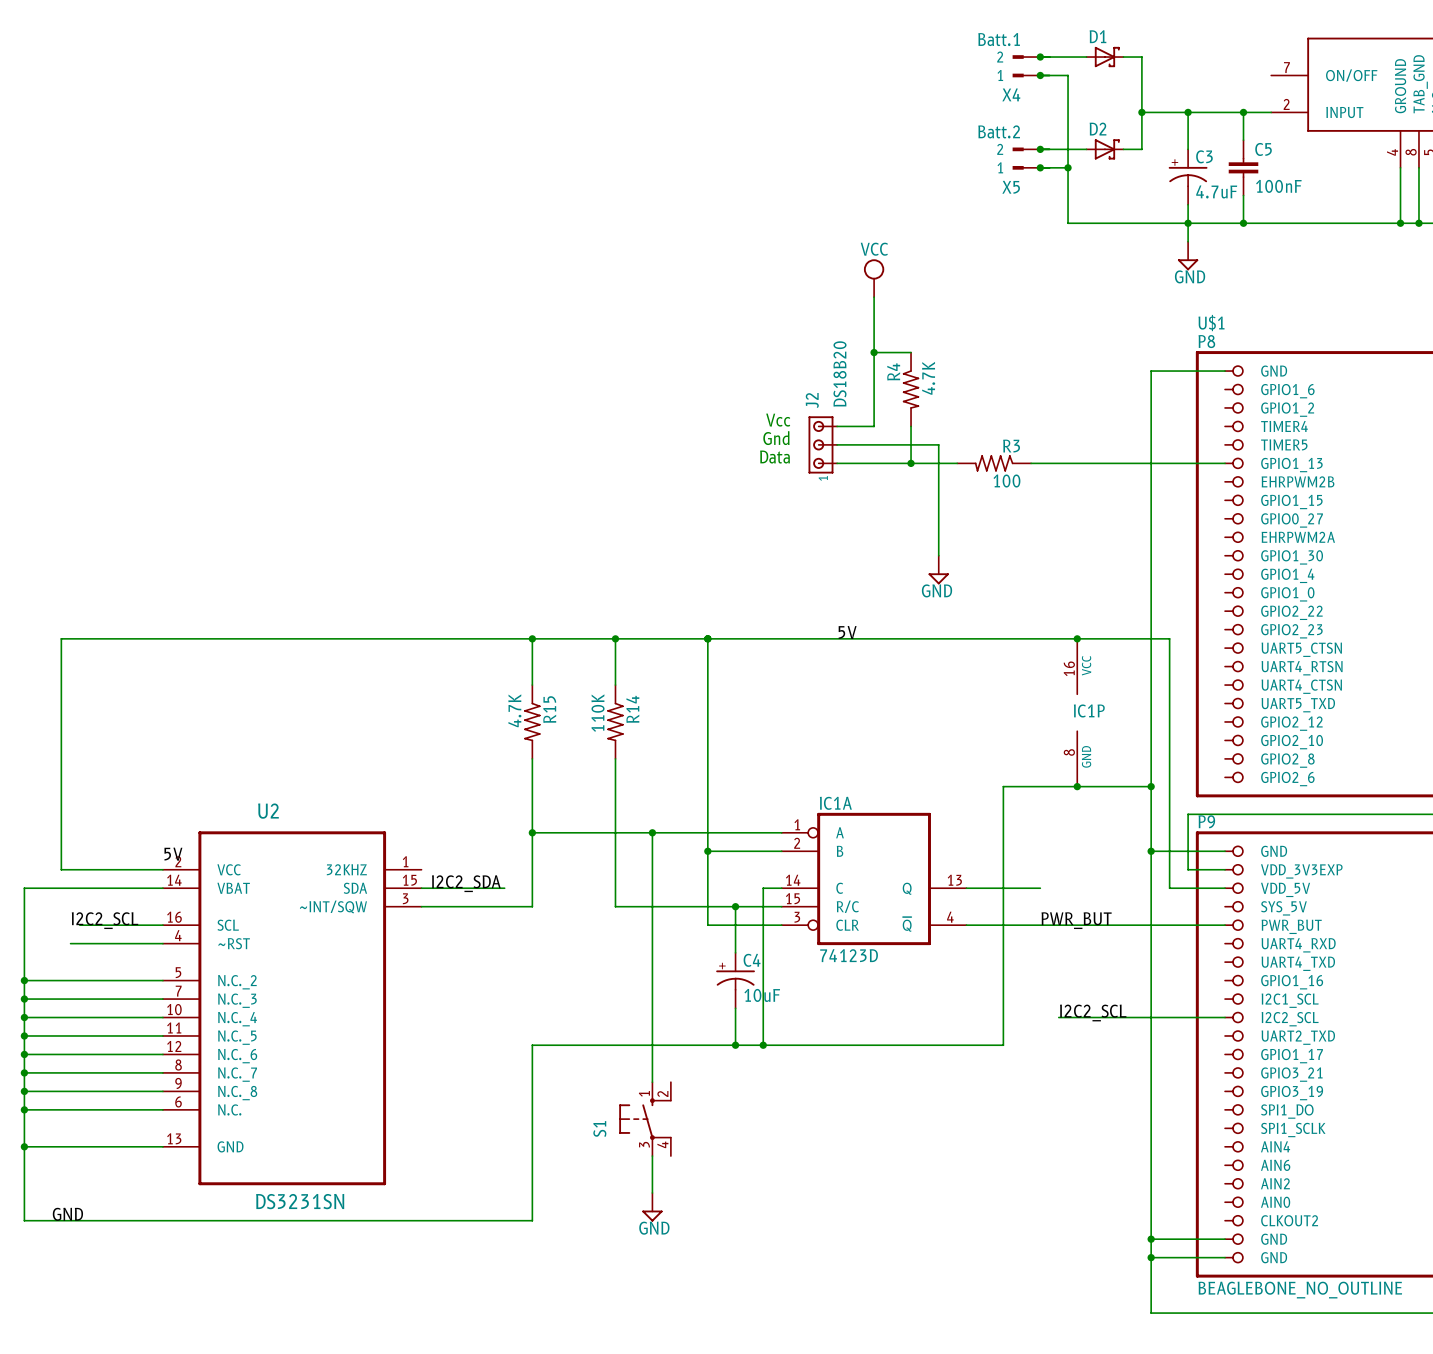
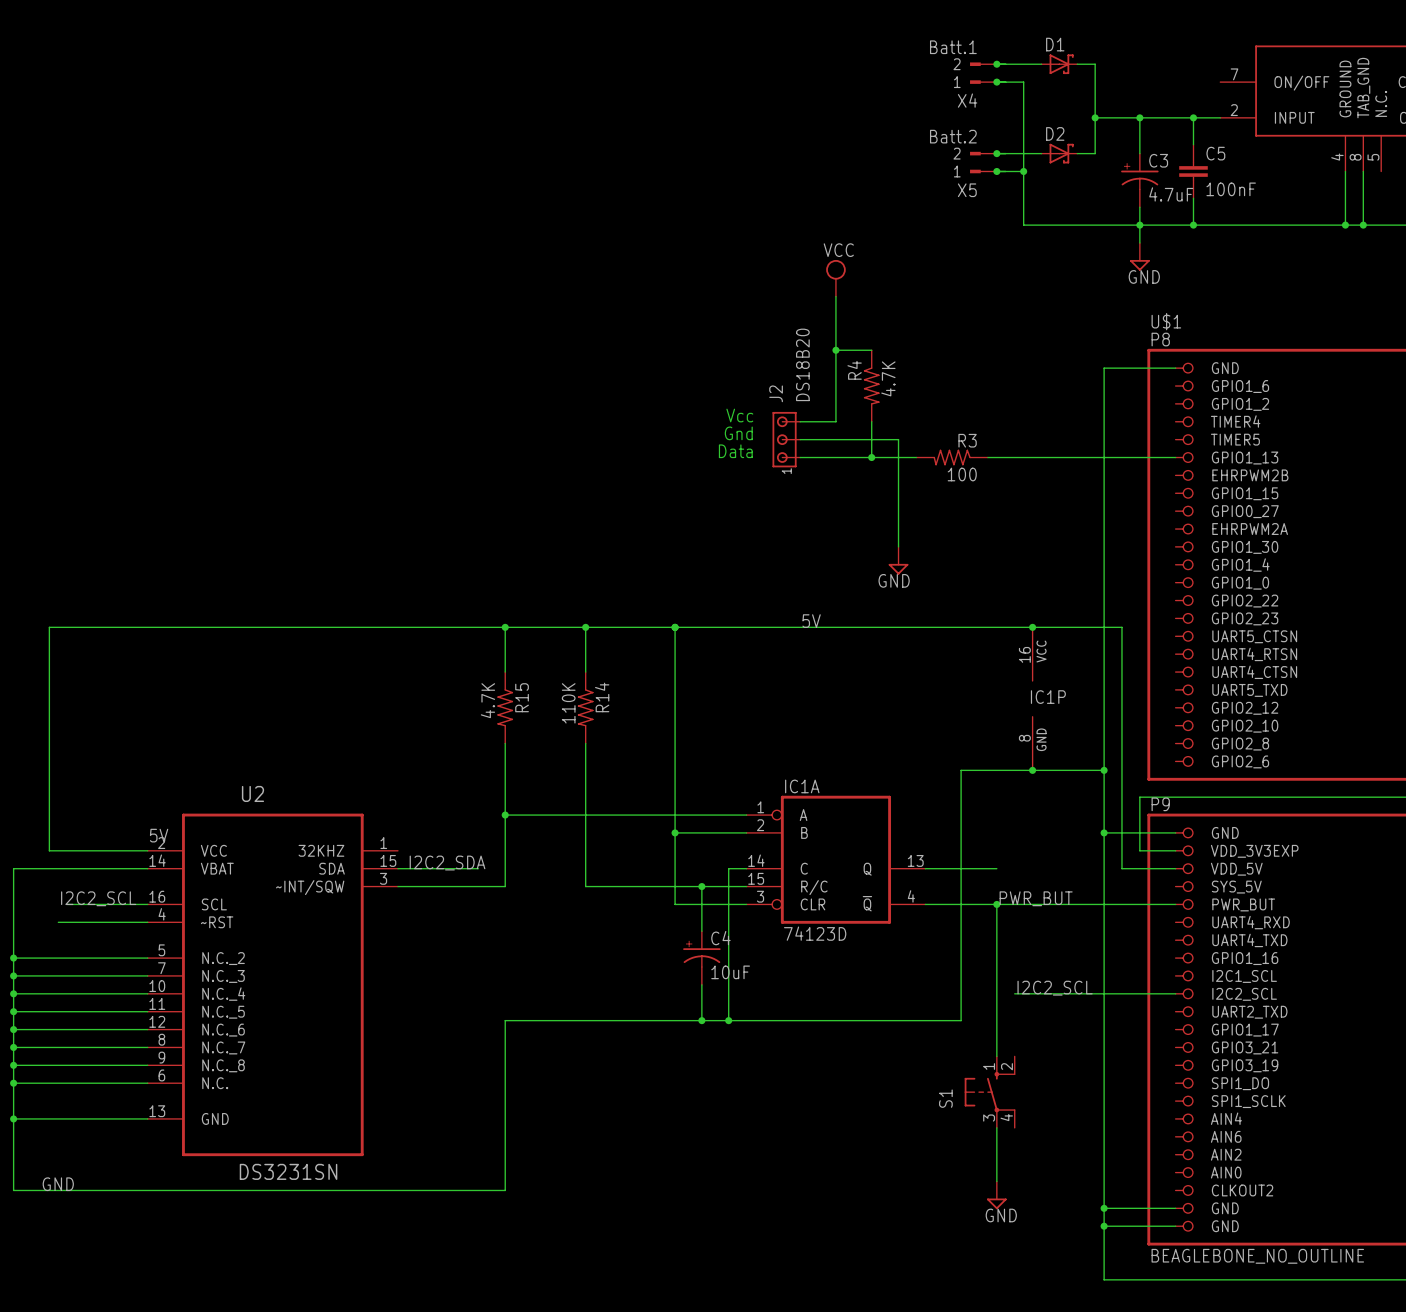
wire: (652, 832) (652, 1082) -> none
junction: (652, 832) -> none
wire: none -> (996, 904) (996, 1056)
junction: none -> (996, 904)
S1 position: (645, 1119) -> (989, 1092)
wire: (652, 1156) (652, 1192) -> none
wire: none -> (996, 1127) (996, 1181)
power symbol: GND (652, 1207) -> none
power symbol: none -> GND (996, 1195)

